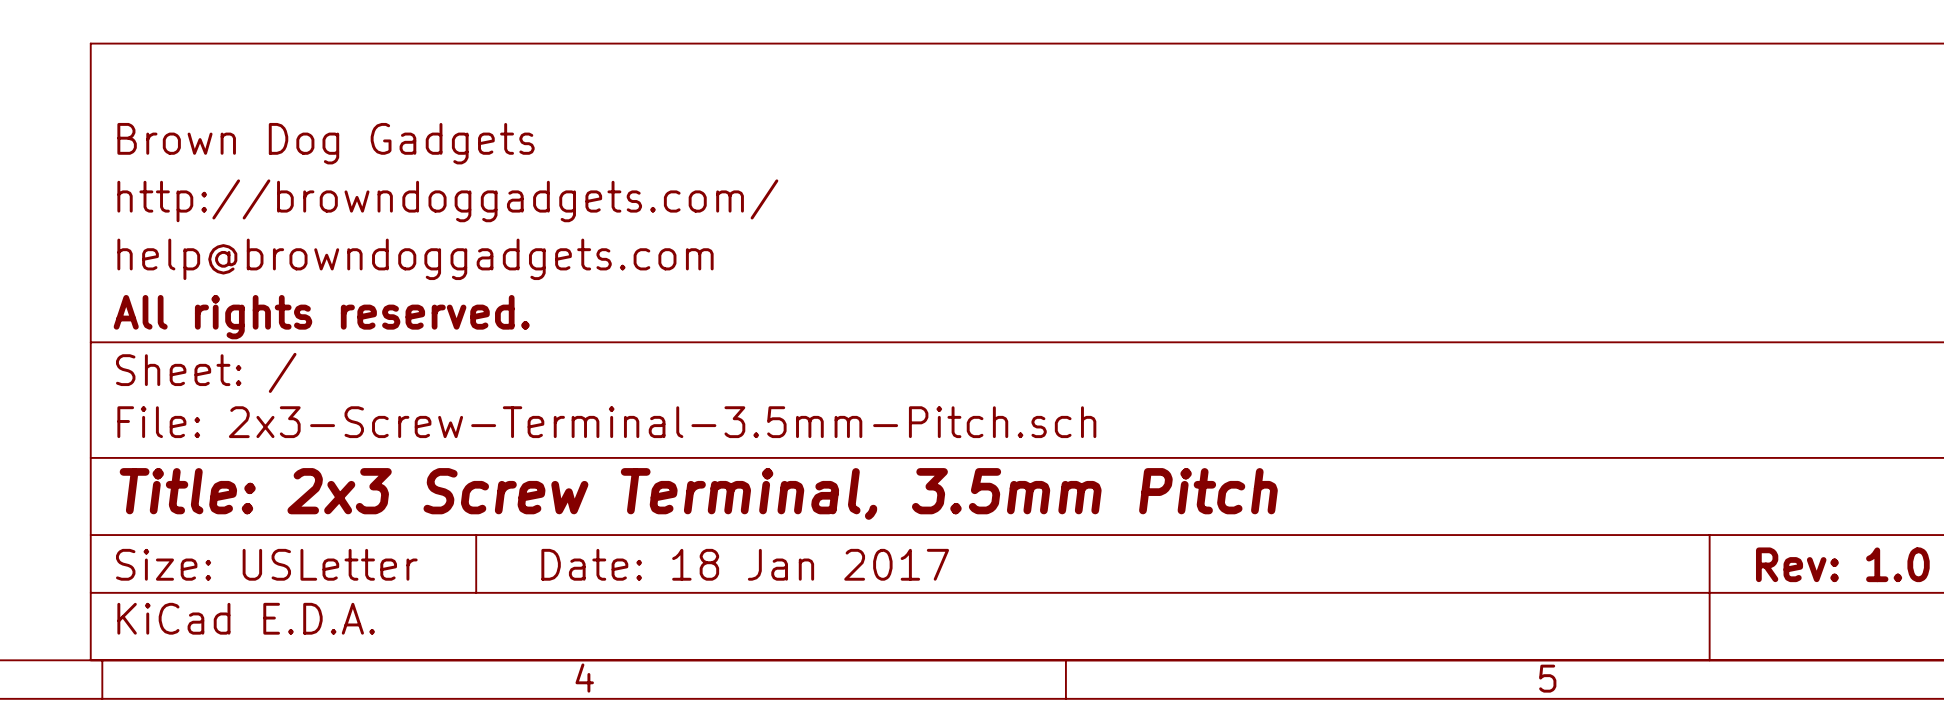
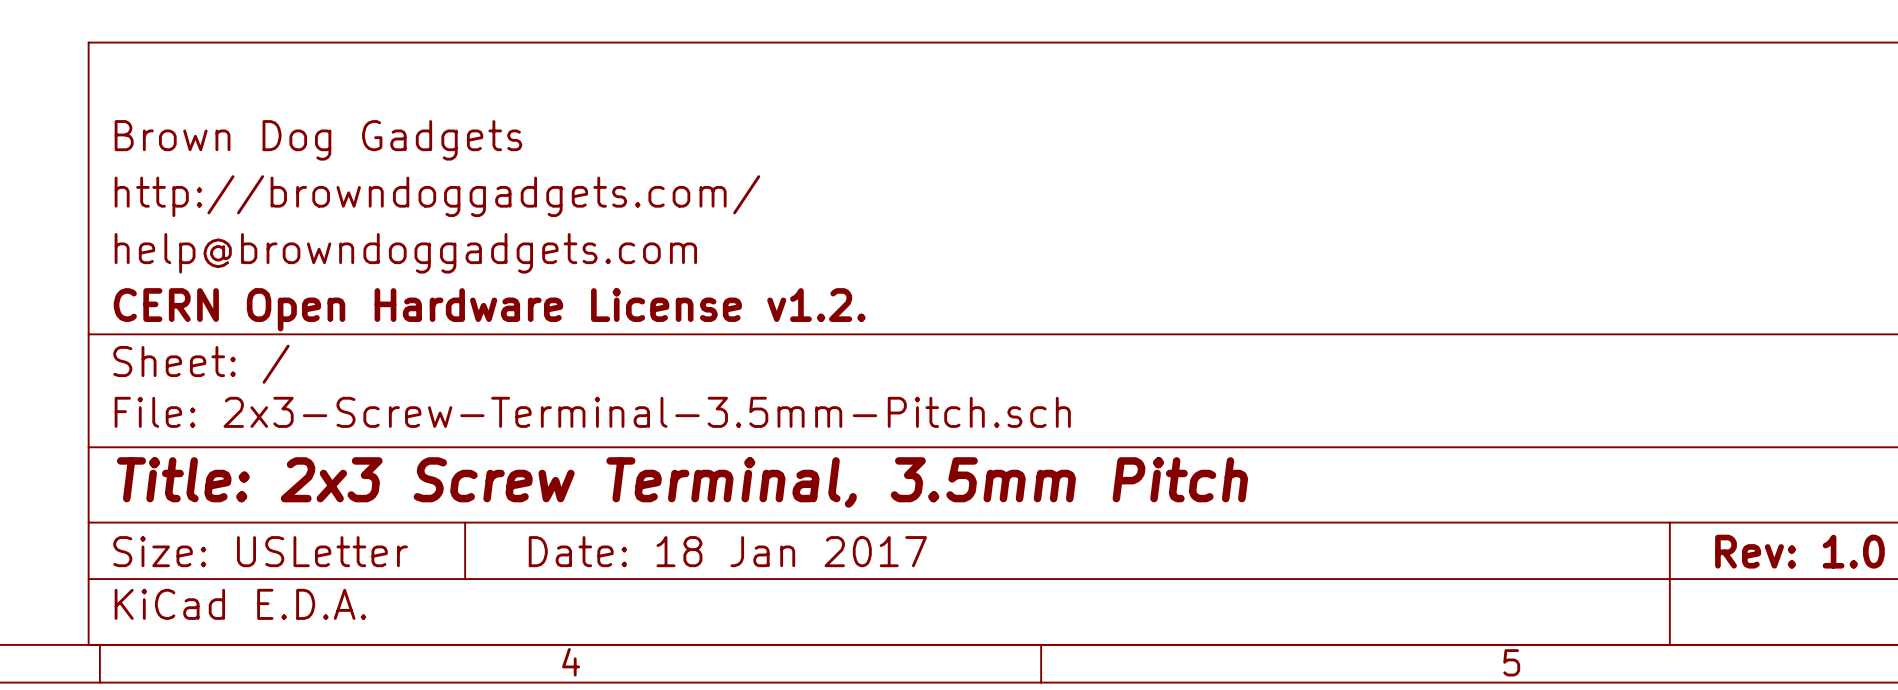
title block: All rights reserved. (321, 317) -> CERN Open Hardware License v1.2. (489, 309)

